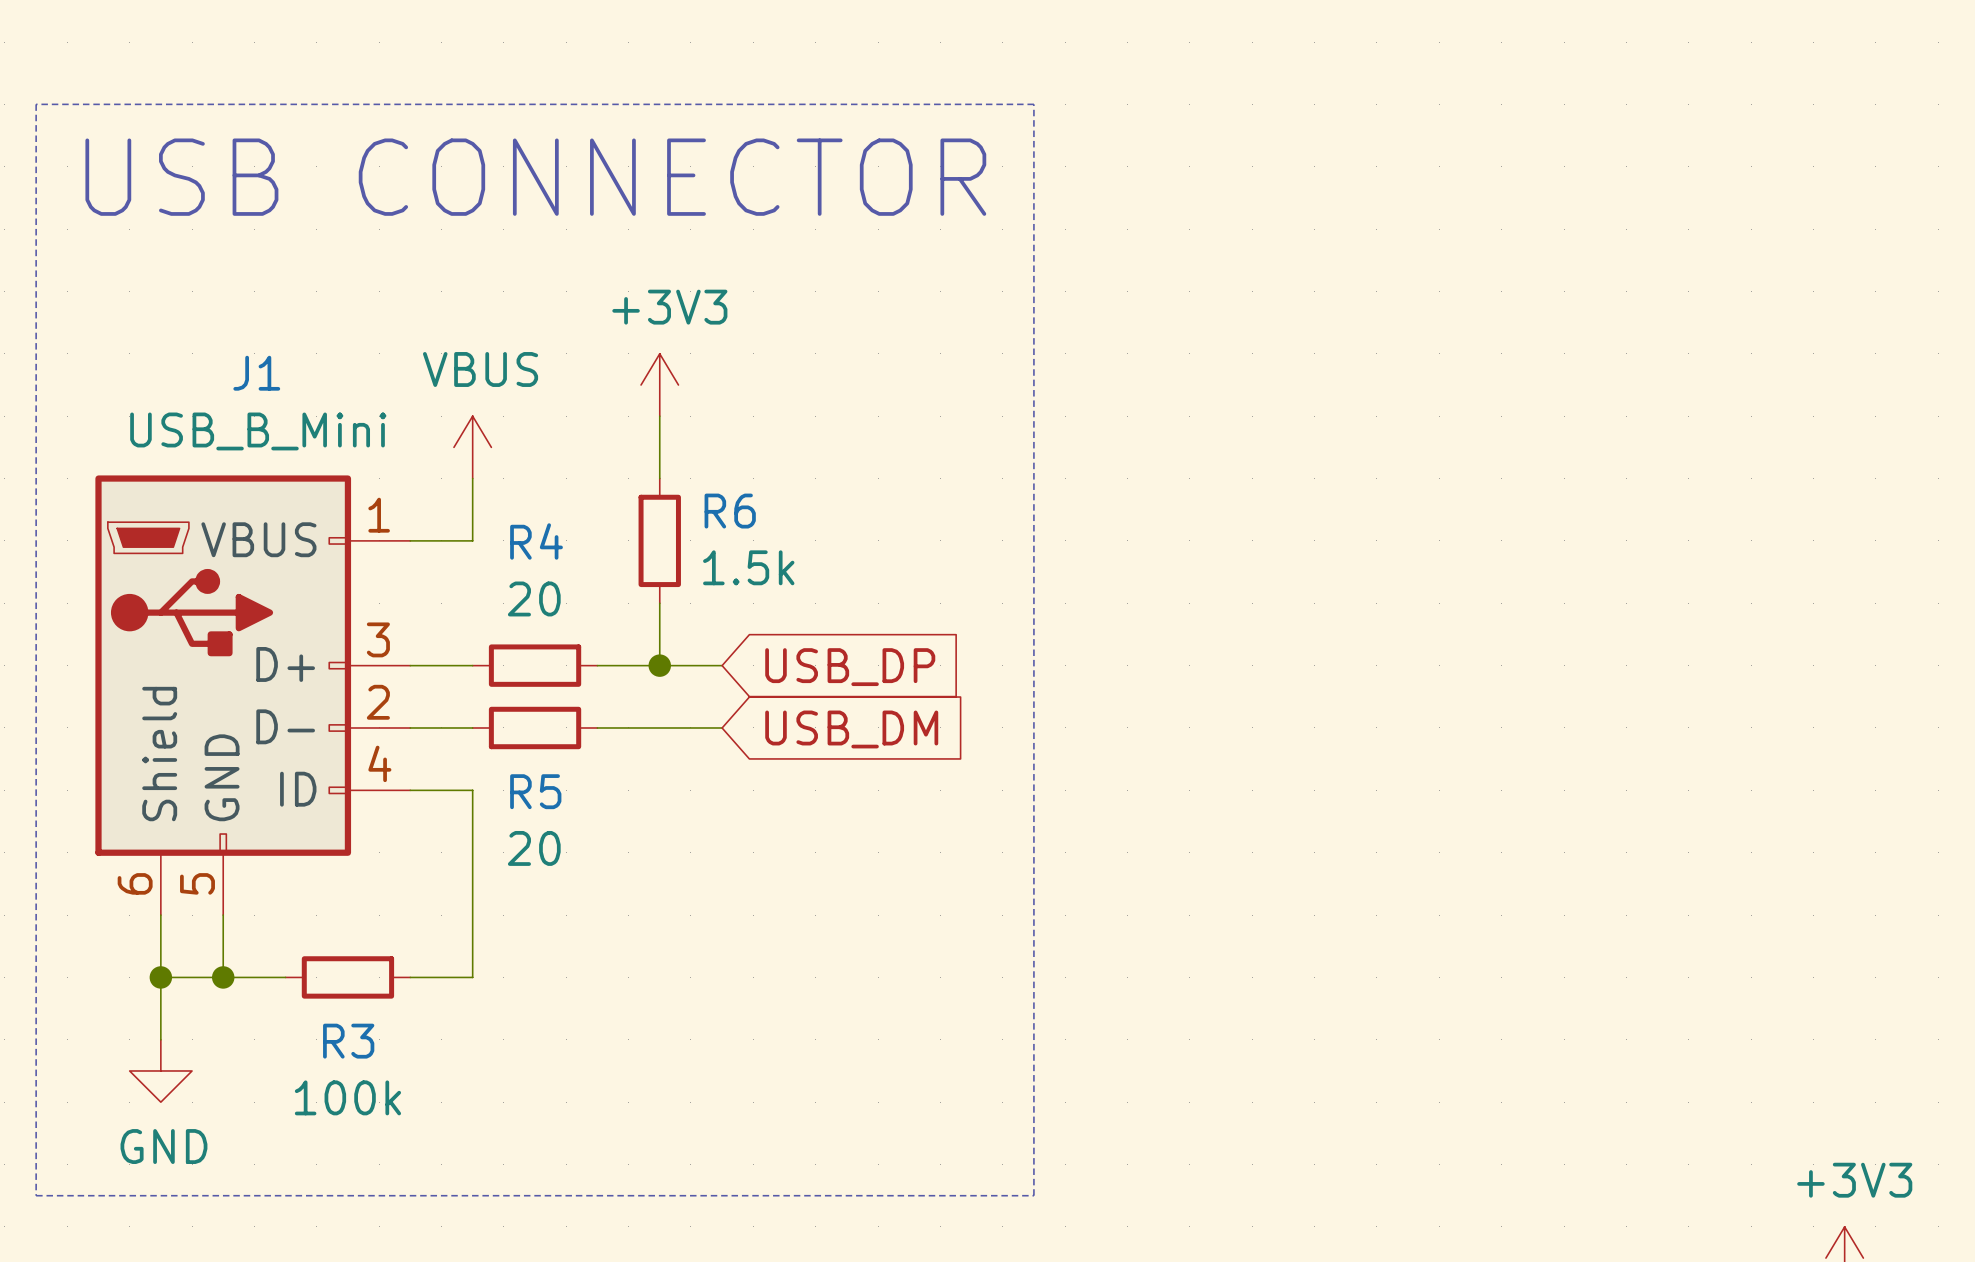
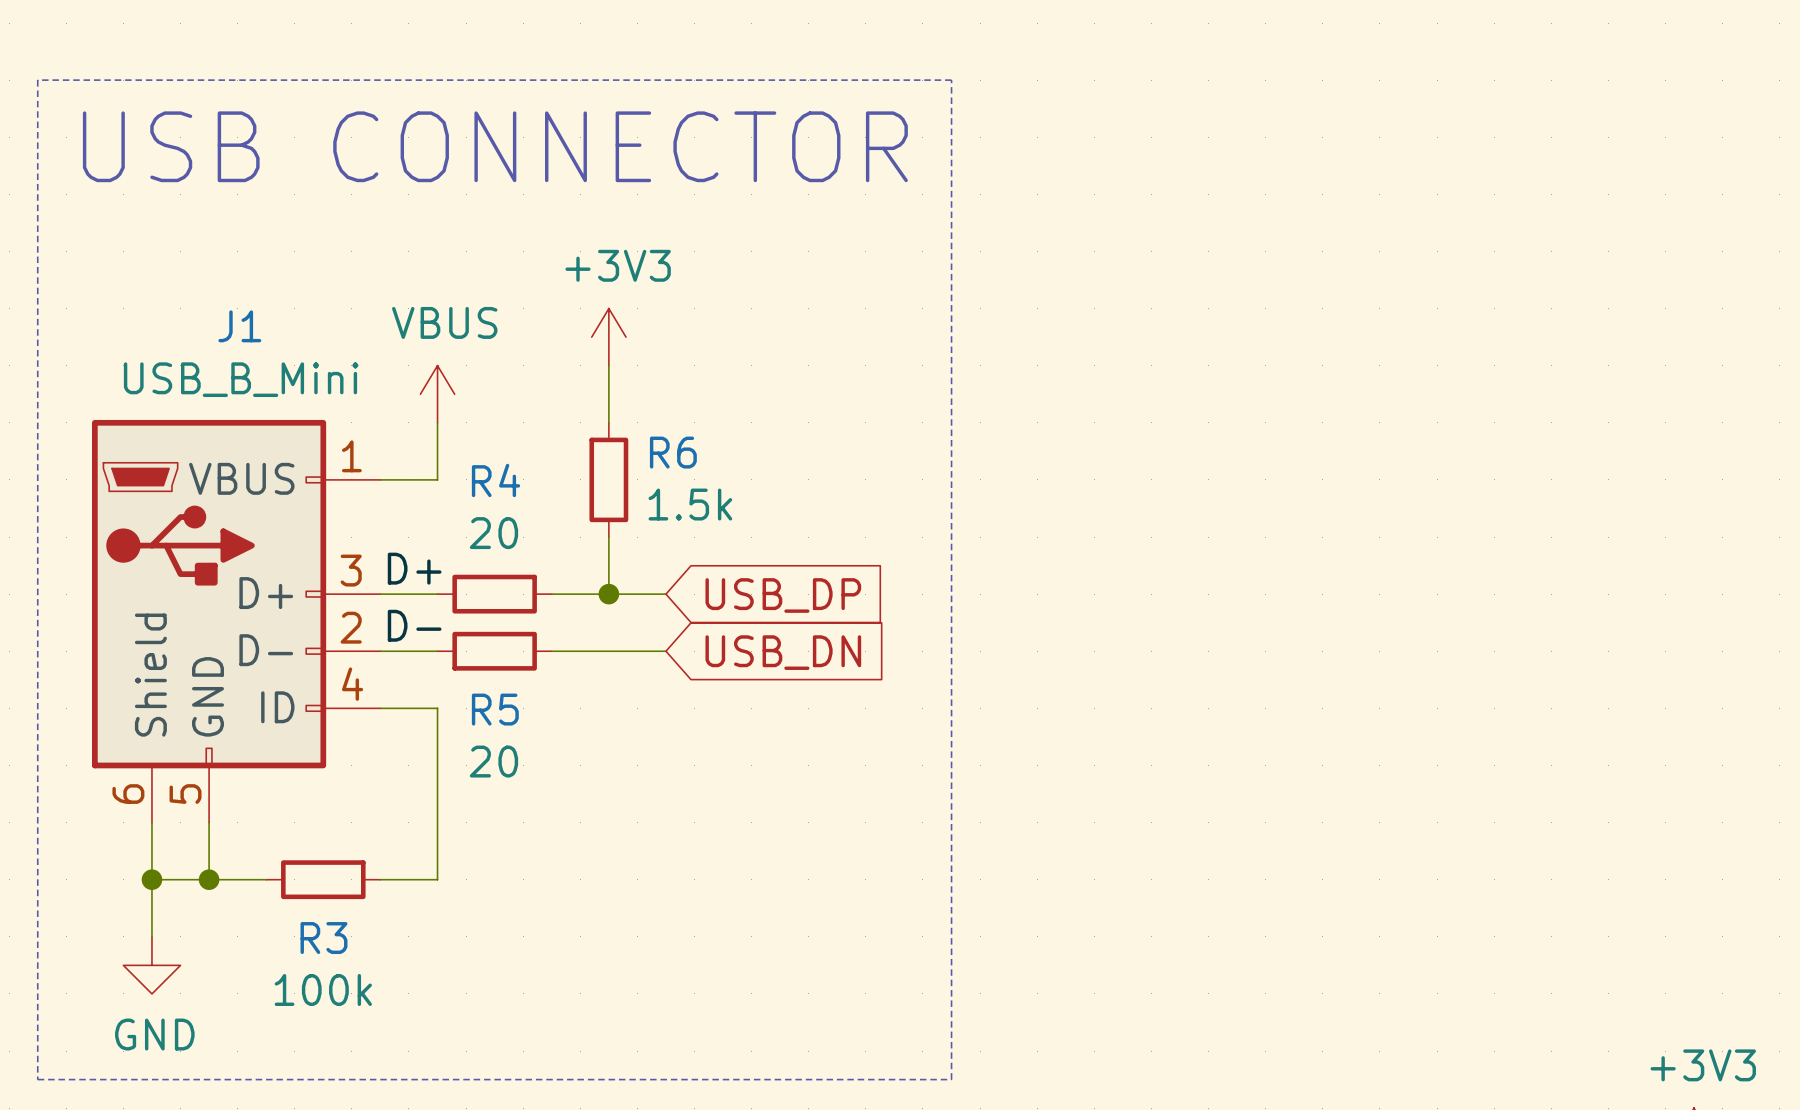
label: none -> D+ (414, 568)
label: none -> D- (414, 625)
global label: USB_DM (851, 729) -> USB_DN (783, 652)

